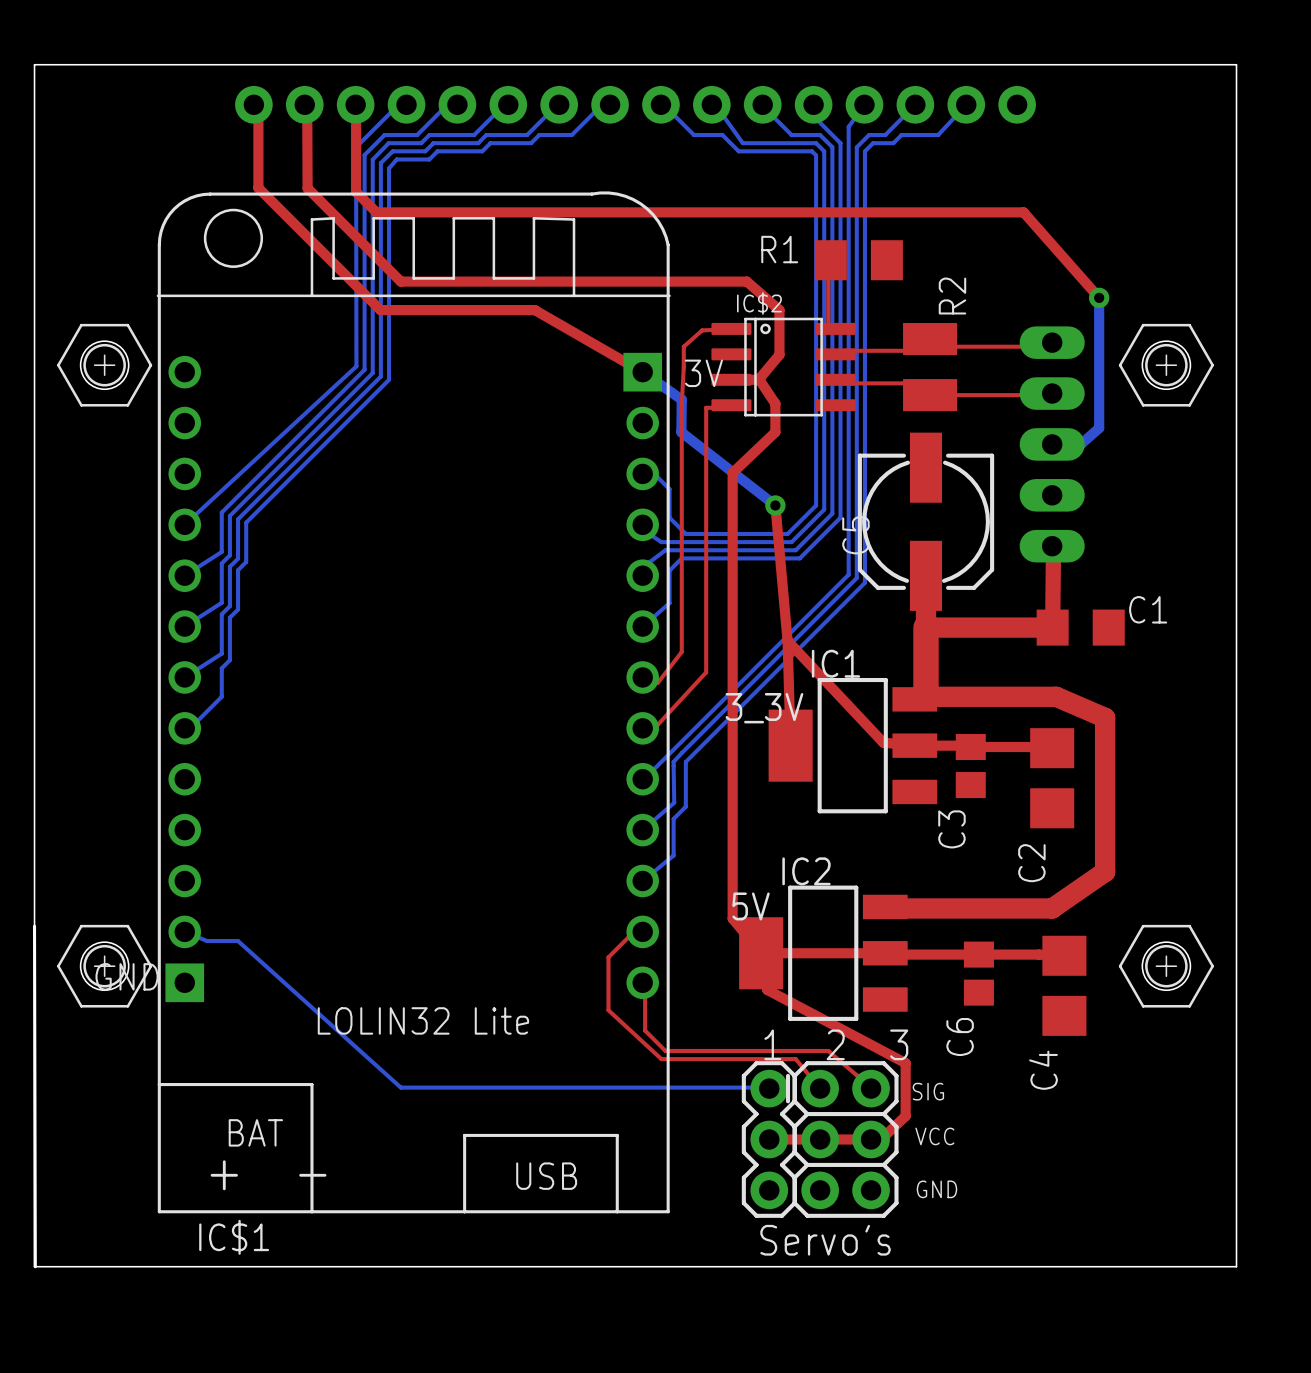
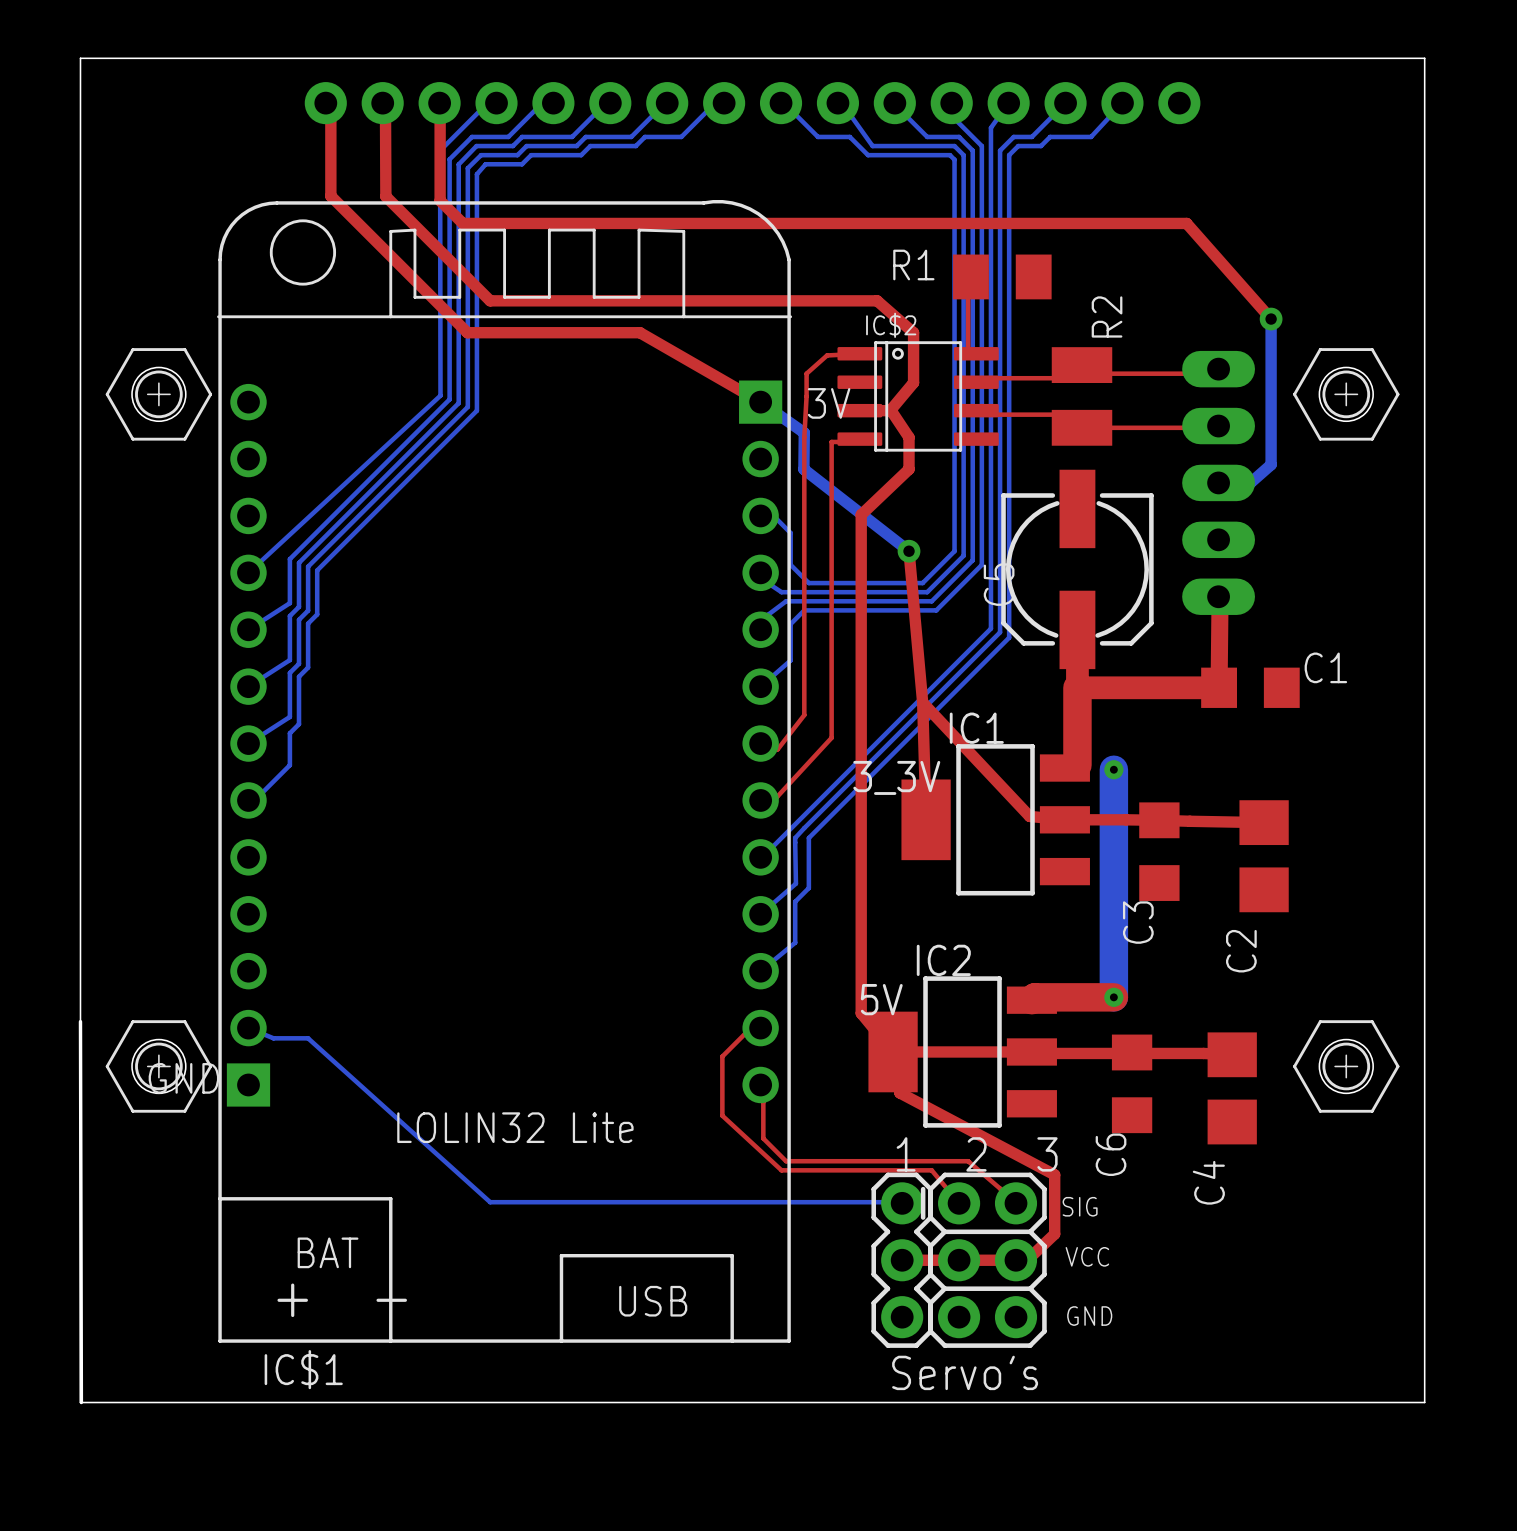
top track: (926, 696) (1056, 696) (1105, 717) (1105, 871) (1052, 908) (886, 908) (885, 906) -> (1113, 997) (1034, 997) (1031, 1000)
bottom track: none -> (1113, 769) (1113, 997)
via: none -> (1113, 769)
C3 footprint: [955, 733, 986, 799] -> [1139, 802, 1180, 901]
top track: (969, 745) (1052, 748) -> (1126, 819) (1264, 822)
C2 position: (1052, 778) -> (1264, 856)
via: none -> (1113, 997)
C6 footprint: [963, 941, 994, 1006] -> [1111, 1034, 1153, 1134]

